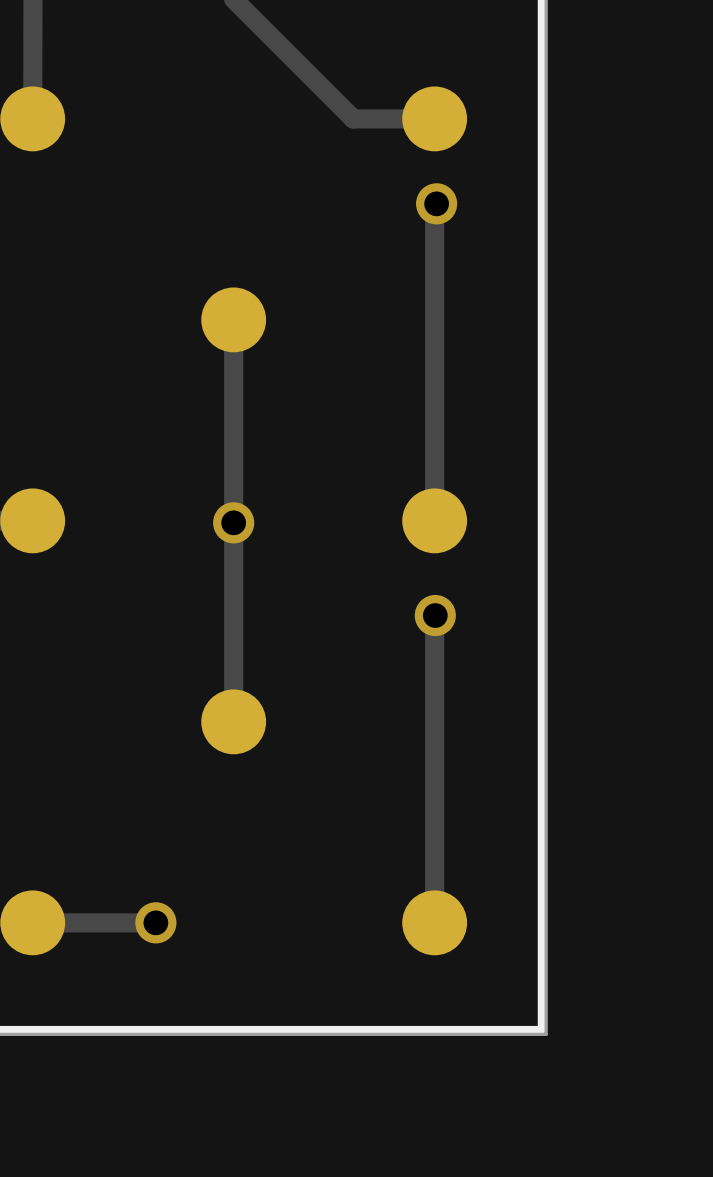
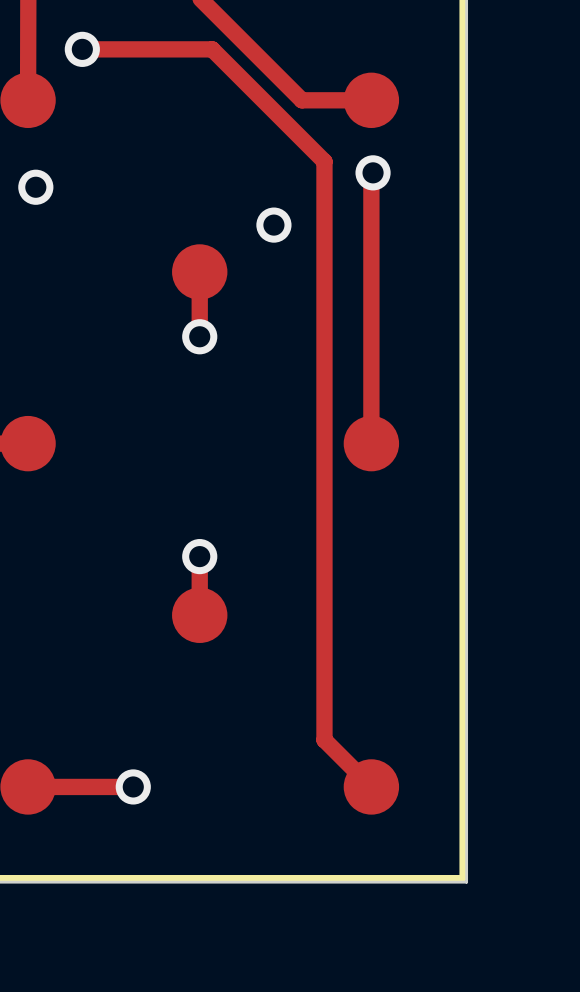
via: none -> (82, 49)
via: none -> (35, 187)
via: none -> (273, 225)
track: (233, 395) (233, 653) -> none
via: none -> (199, 336)
via: (233, 522) -> none
via: (435, 615) -> none
track: (434, 616) (434, 922) -> (82, 49) (212, 49) (324, 161) (324, 740) (371, 786)
via: none -> (199, 556)

